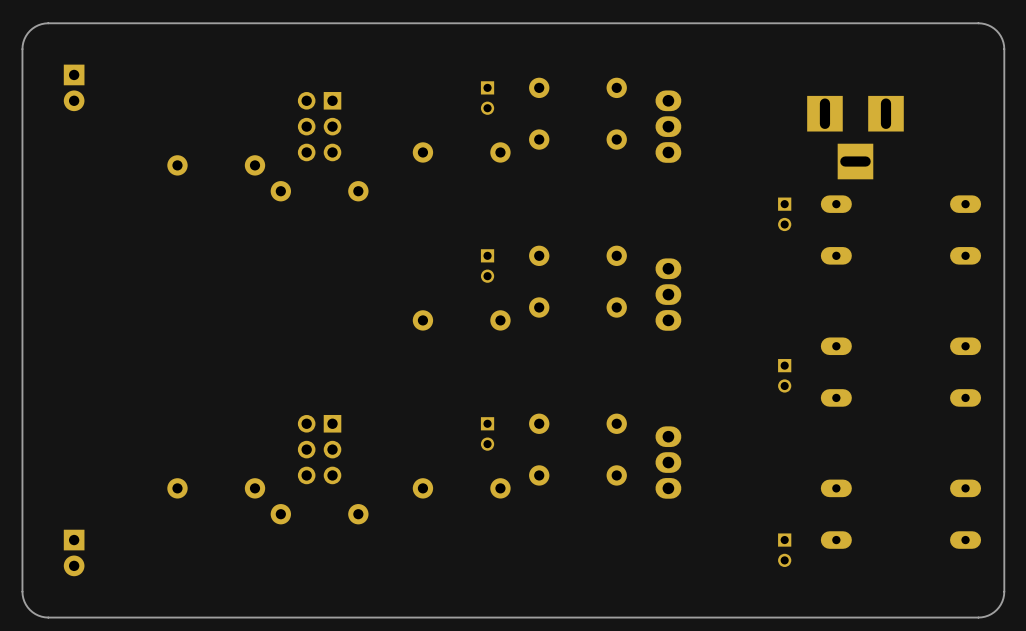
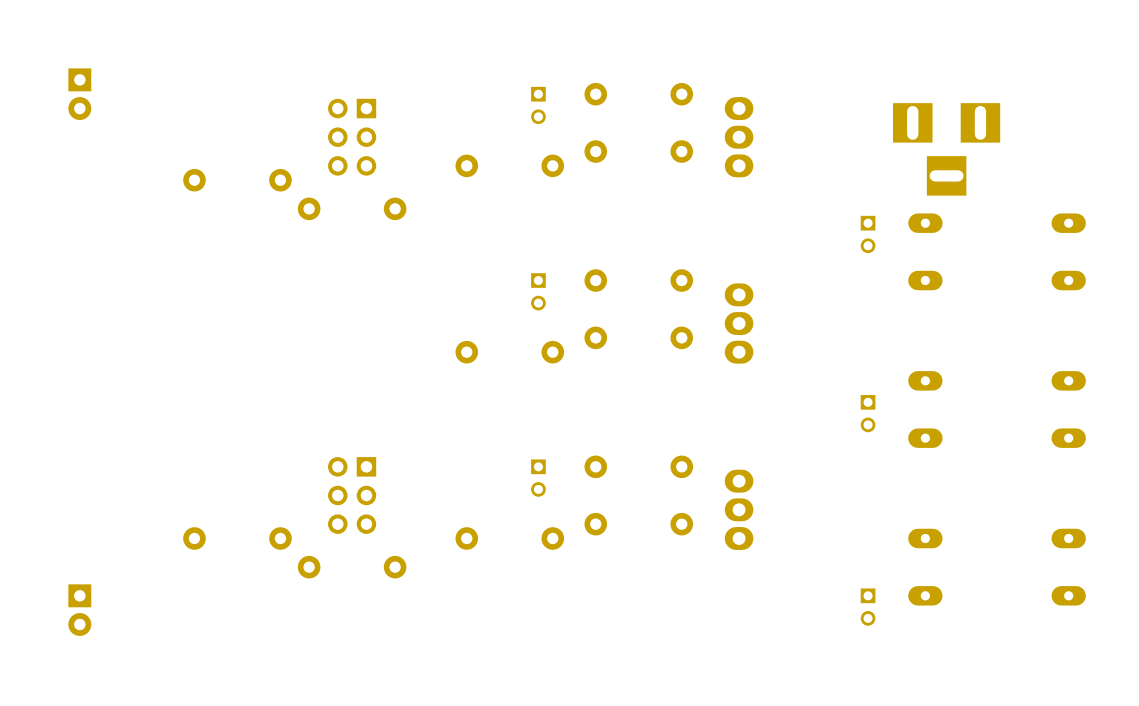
board edge: (978, 23) (48, 23) (35, 26) (25, 36) (22, 49) (22, 591) (25, 604) (35, 614) (48, 617) (978, 617) (991, 614) (1000, 604) (1004, 591) (1004, 49) (1002, 39) (996, 30) (988, 25) (978, 23) -> none

